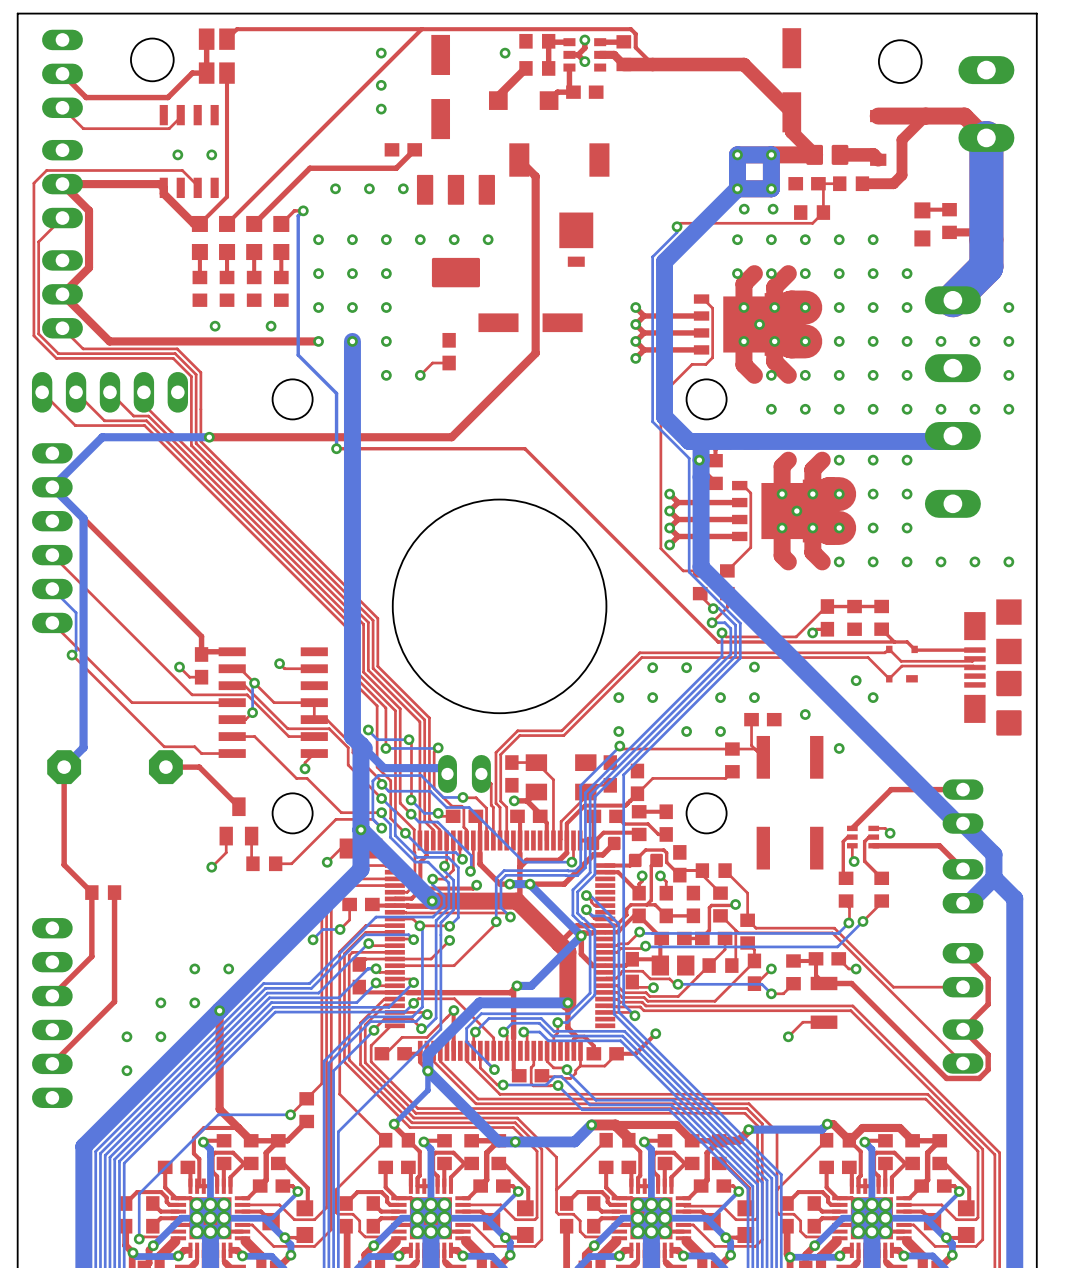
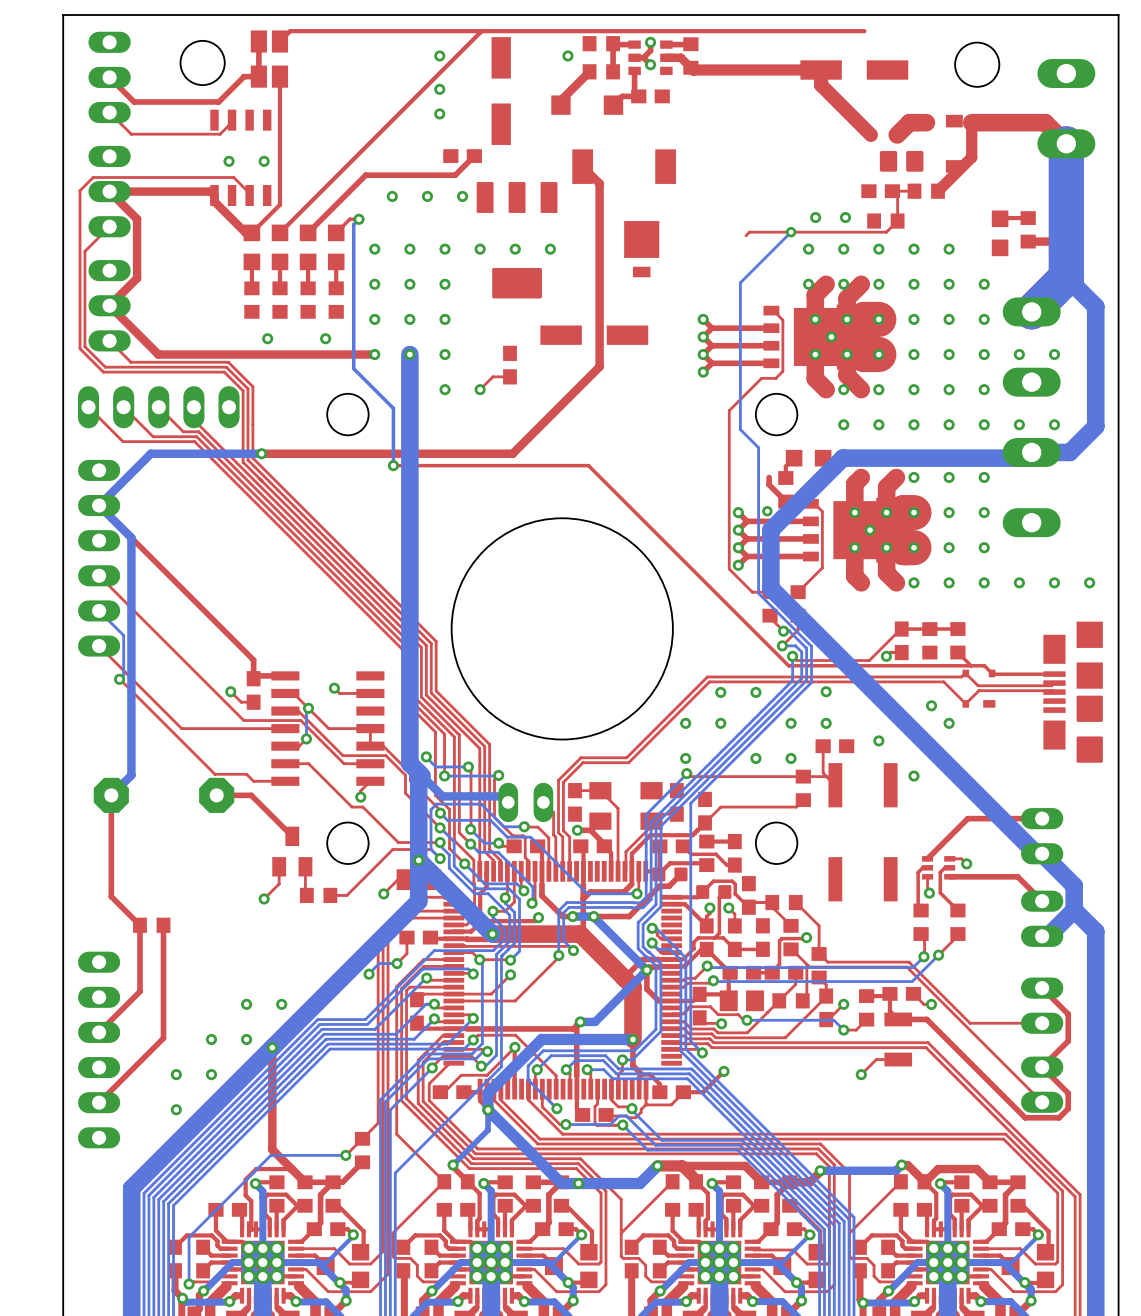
top track: (630, 29) (635, 33) (635, 47) (652, 64) -> (698, 31) (864, 31)
top track: (623, 64) (744, 64) (791, 112) (791, 132) (814, 154) (737, 154) (737, 188) (771, 188) (771, 154) -> (690, 67) (693, 70) (821, 70) (821, 85) (870, 134)
part rotation: 0° (791, 80) -> 90° clockwise (854, 70)
top track: (878, 116) (966, 117) -> none
top track: (925, 116) (901, 139) (901, 175) (893, 183) (862, 183) -> (1045, 122) (971, 122) (971, 157) (938, 191)
top track: none -> (926, 122) (909, 122) (897, 134)
via: (737, 154) -> none
via: (771, 154) -> none
top track: (840, 154) (873, 154) (878, 159) -> none
bottom track: (737, 188) (771, 188) (771, 154) (737, 154) (737, 188) -> none
bottom track: (737, 188) (664, 261) (664, 416) (689, 441) (770, 441) -> none
via: (737, 188) -> none
via: (771, 188) -> none
via: none -> (791, 232)
bottom track: (677, 226) (677, 232) (652, 256) (652, 421) (689, 458) -> (791, 232) (740, 282) (740, 429) (758, 447) (758, 475)
via: (677, 226) -> none
bottom track: none -> (1066, 277) (1095, 306) (1095, 426) (1069, 452) (1031, 452)
via: (1008, 307) -> none
via: (1008, 341) -> none
via: (1008, 375) -> none
via: (1008, 409) -> none
bottom track: (701, 441) (701, 511) -> (842, 458) (770, 530)
via: (699, 460) -> none
via: none -> (767, 511)

